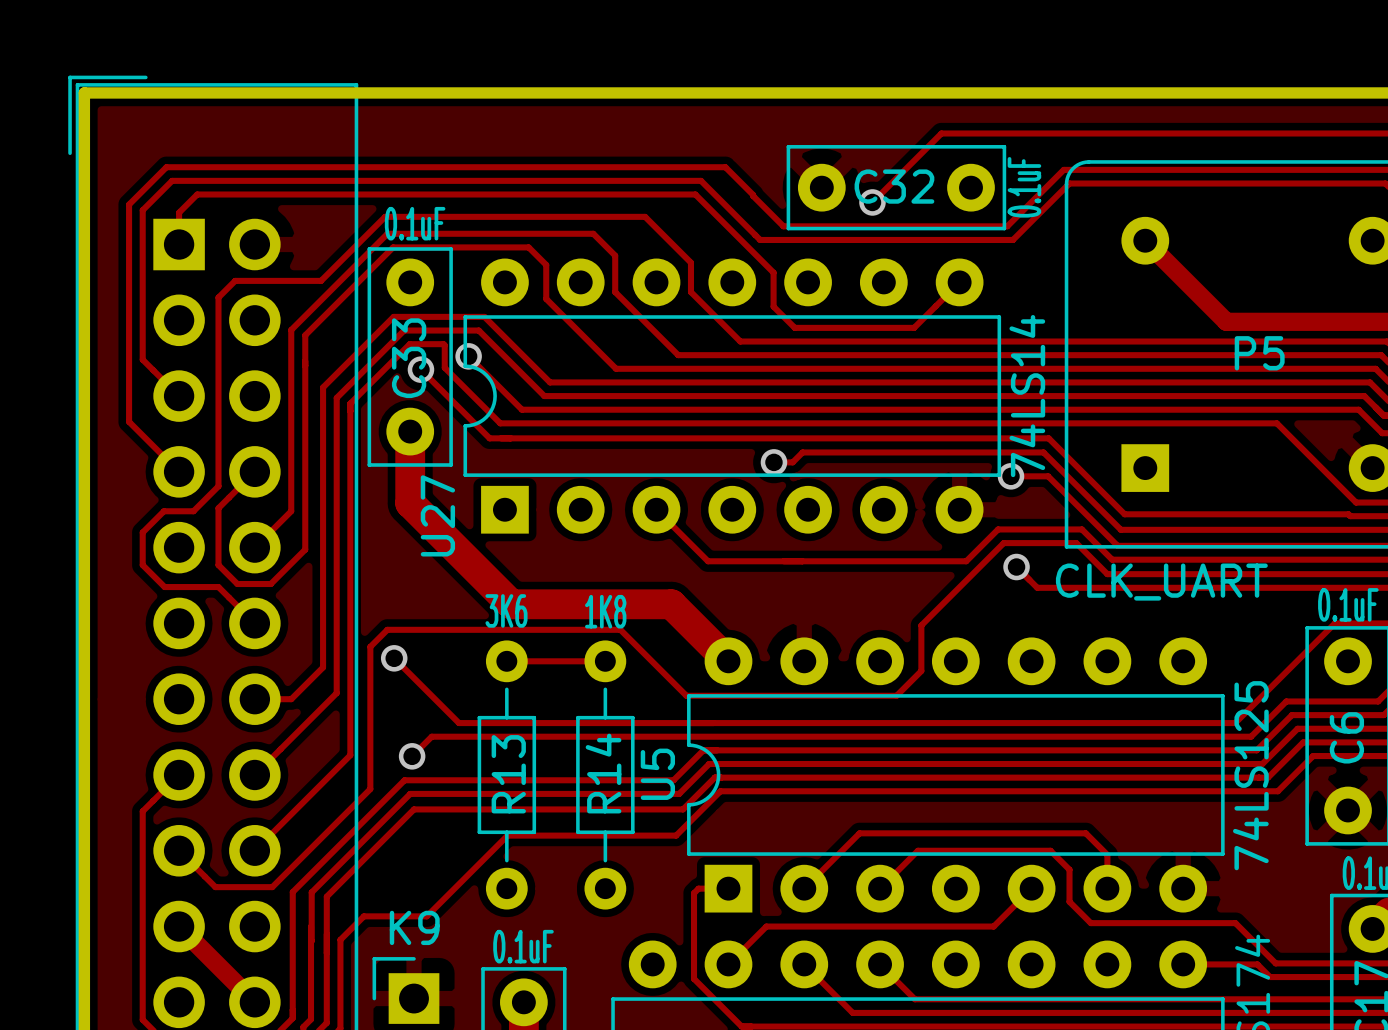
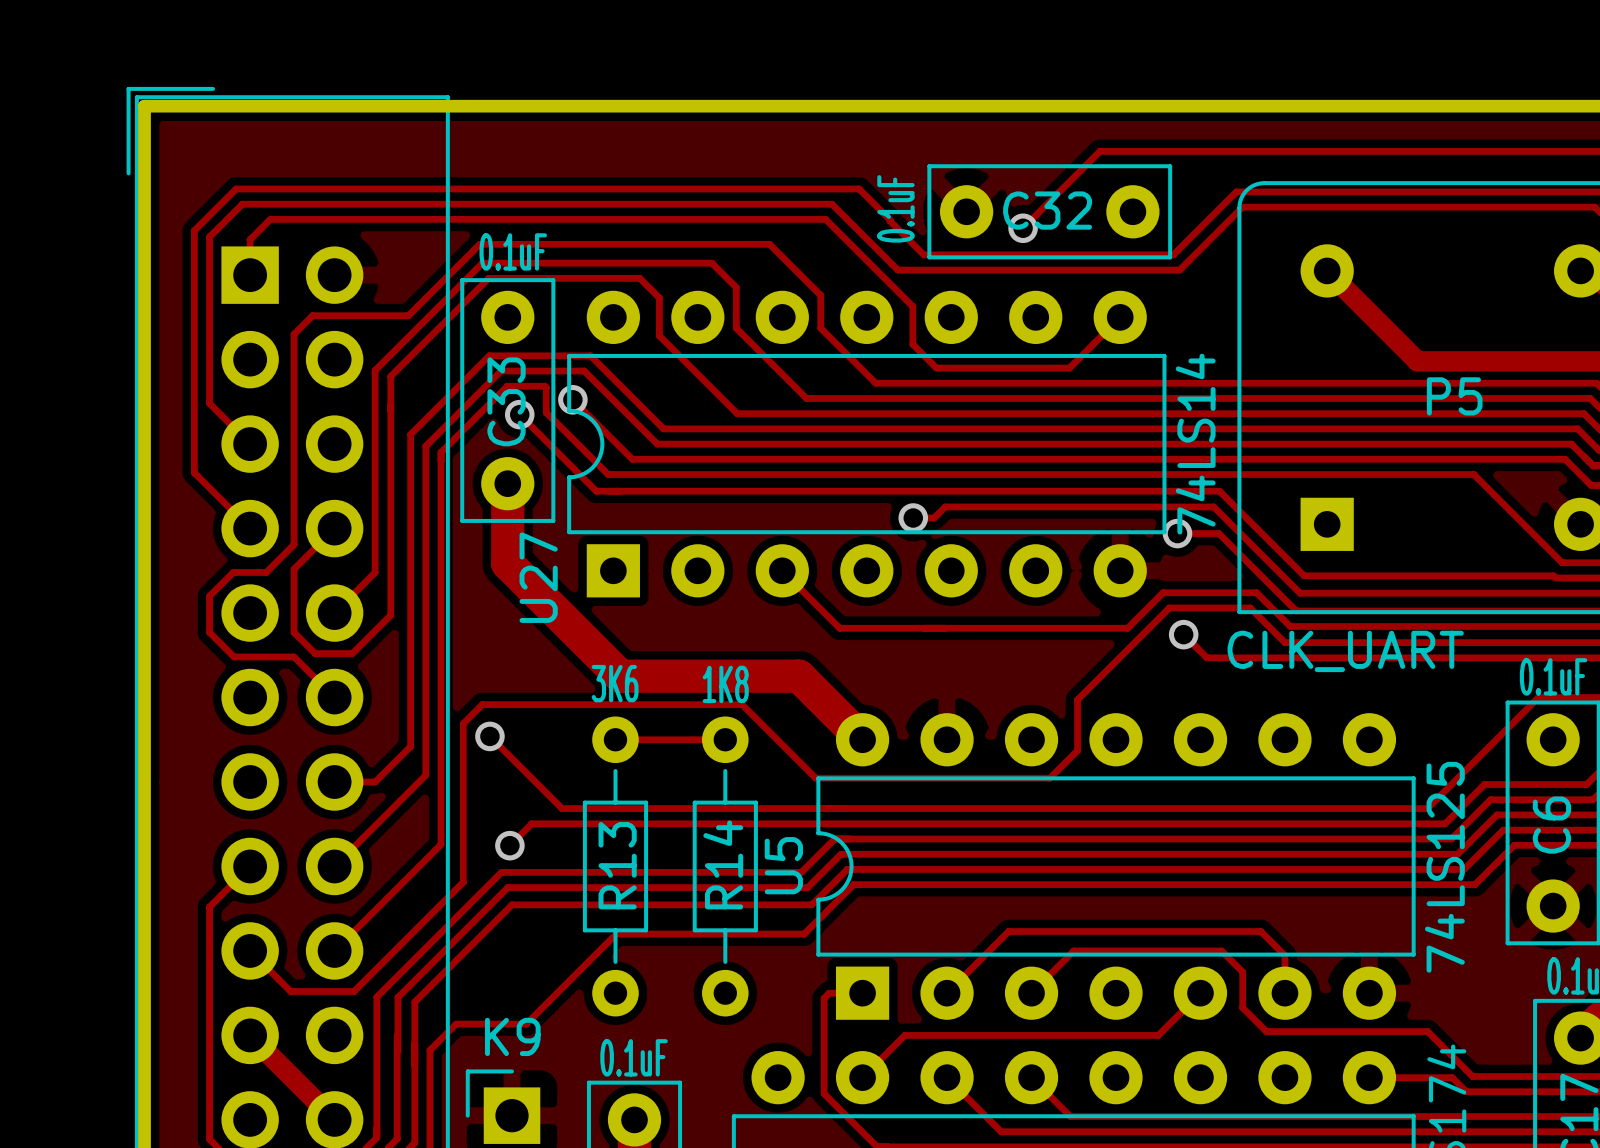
C32 value position: 0.1uF (1024, 187) -> 0.1uF (895, 208)

